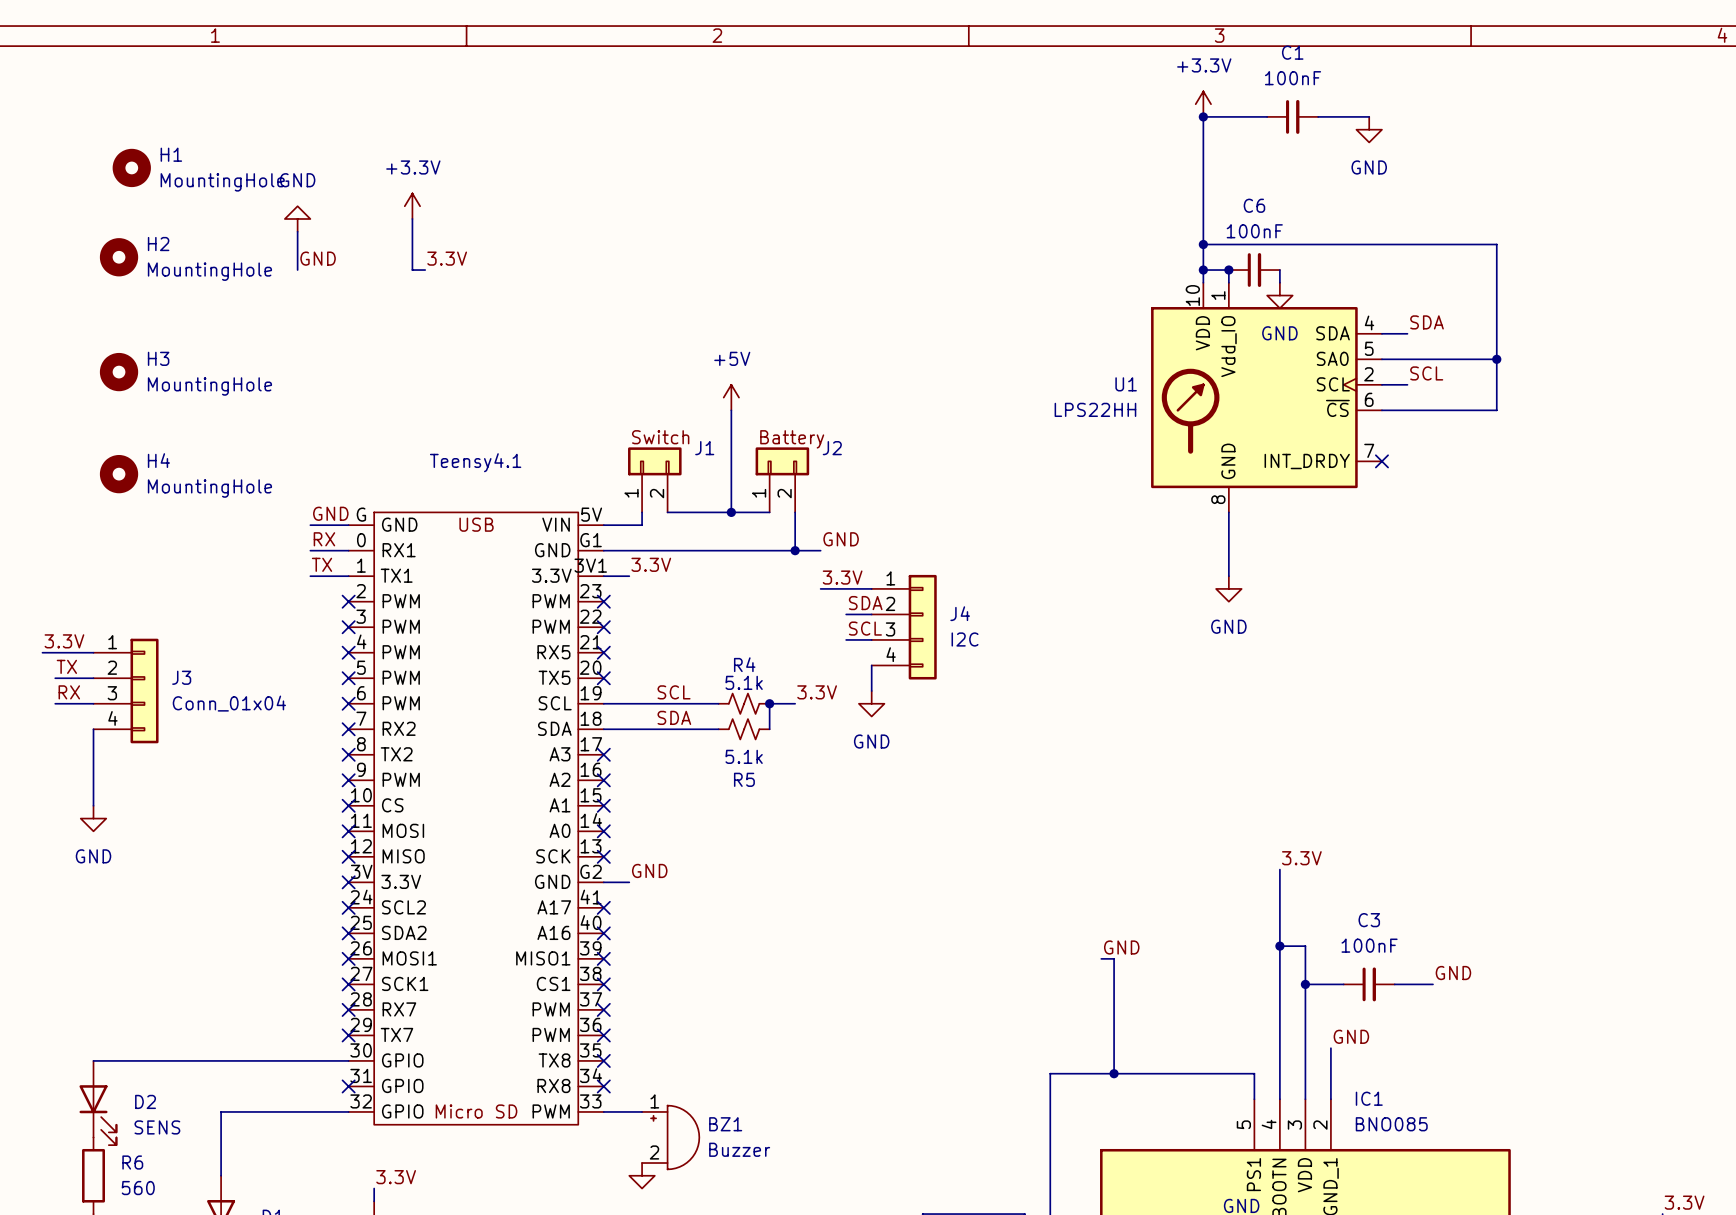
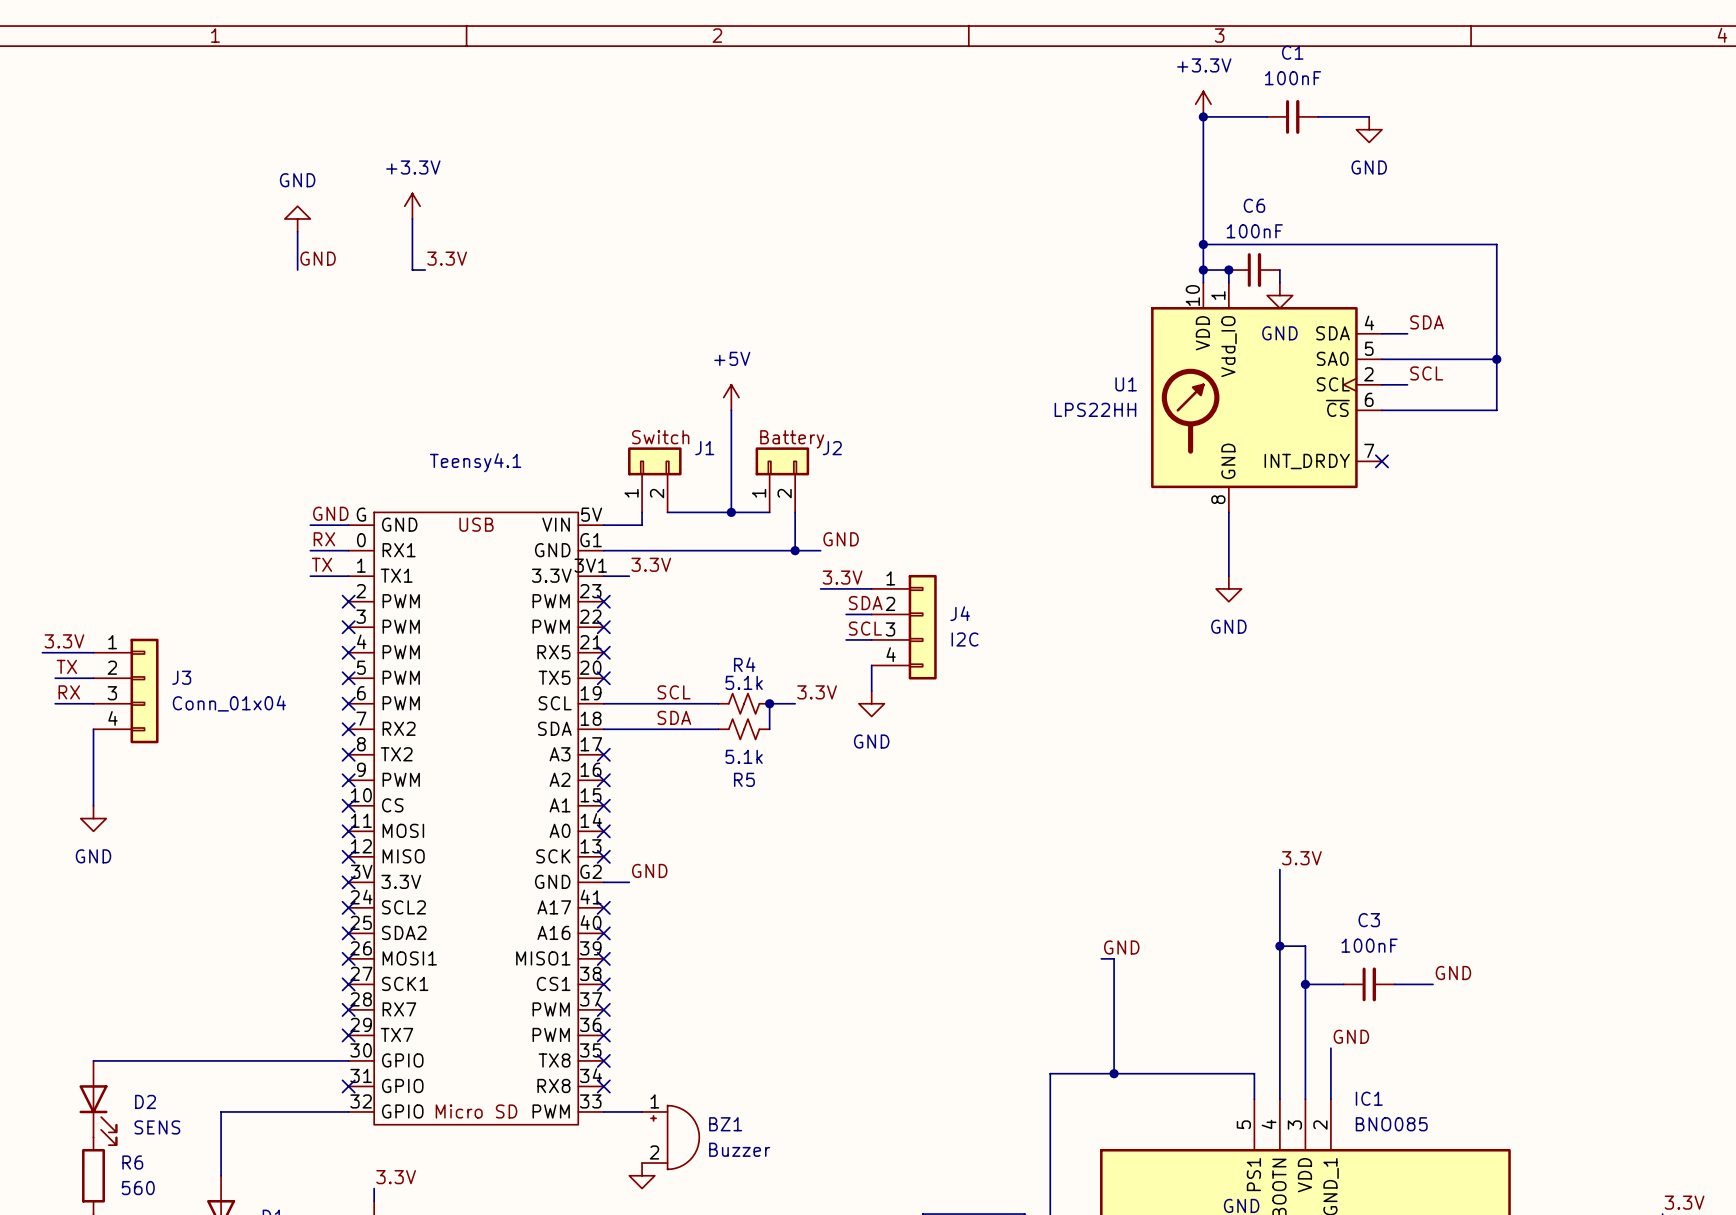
H1: MountingHole (131, 167) -> none
H2: MountingHole (119, 257) -> none
H3: MountingHole (119, 372) -> none
H4: MountingHole (119, 474) -> none

